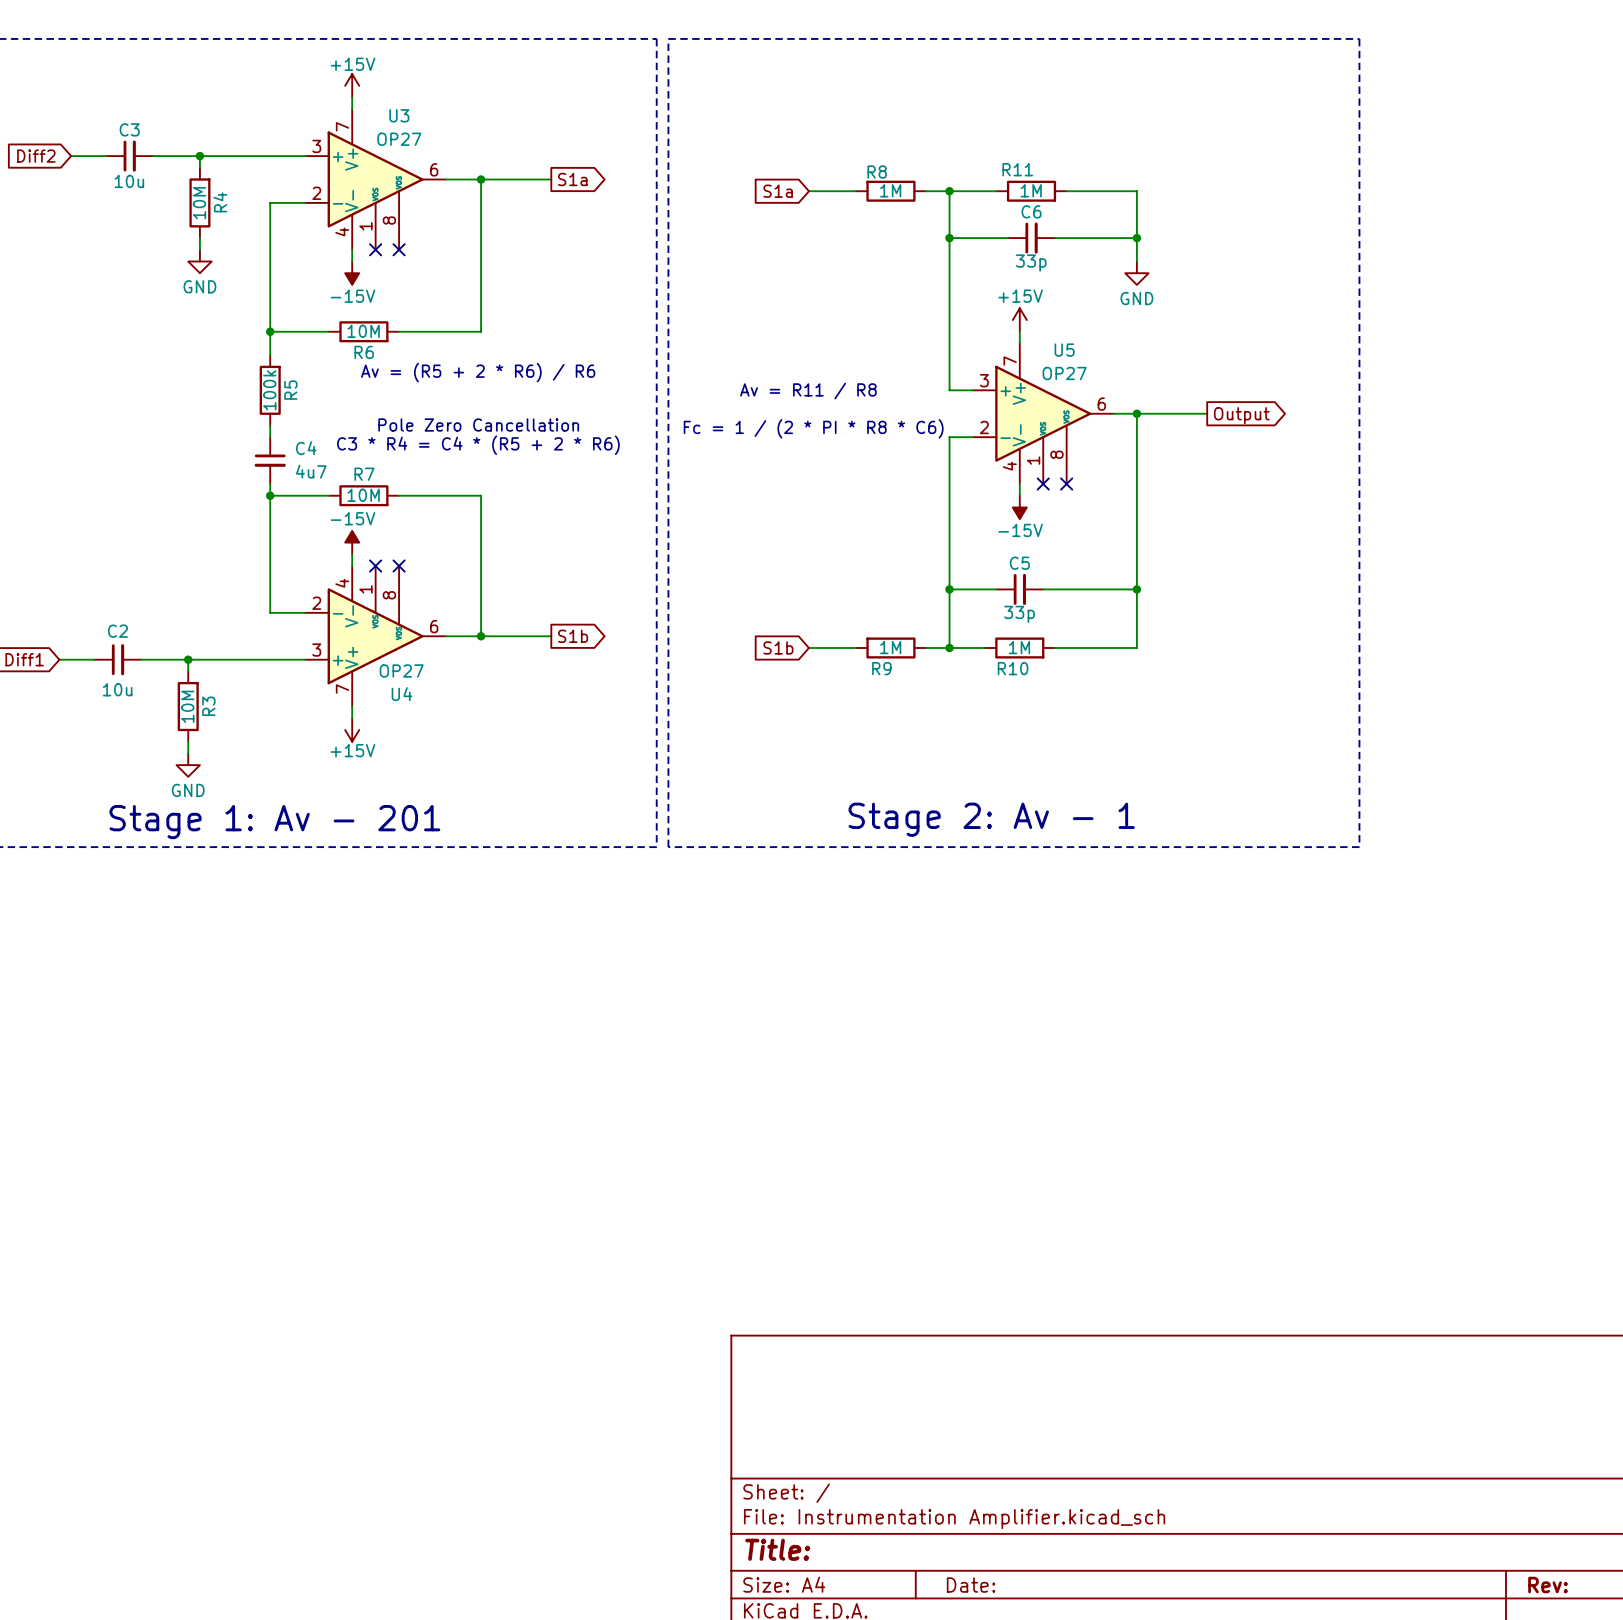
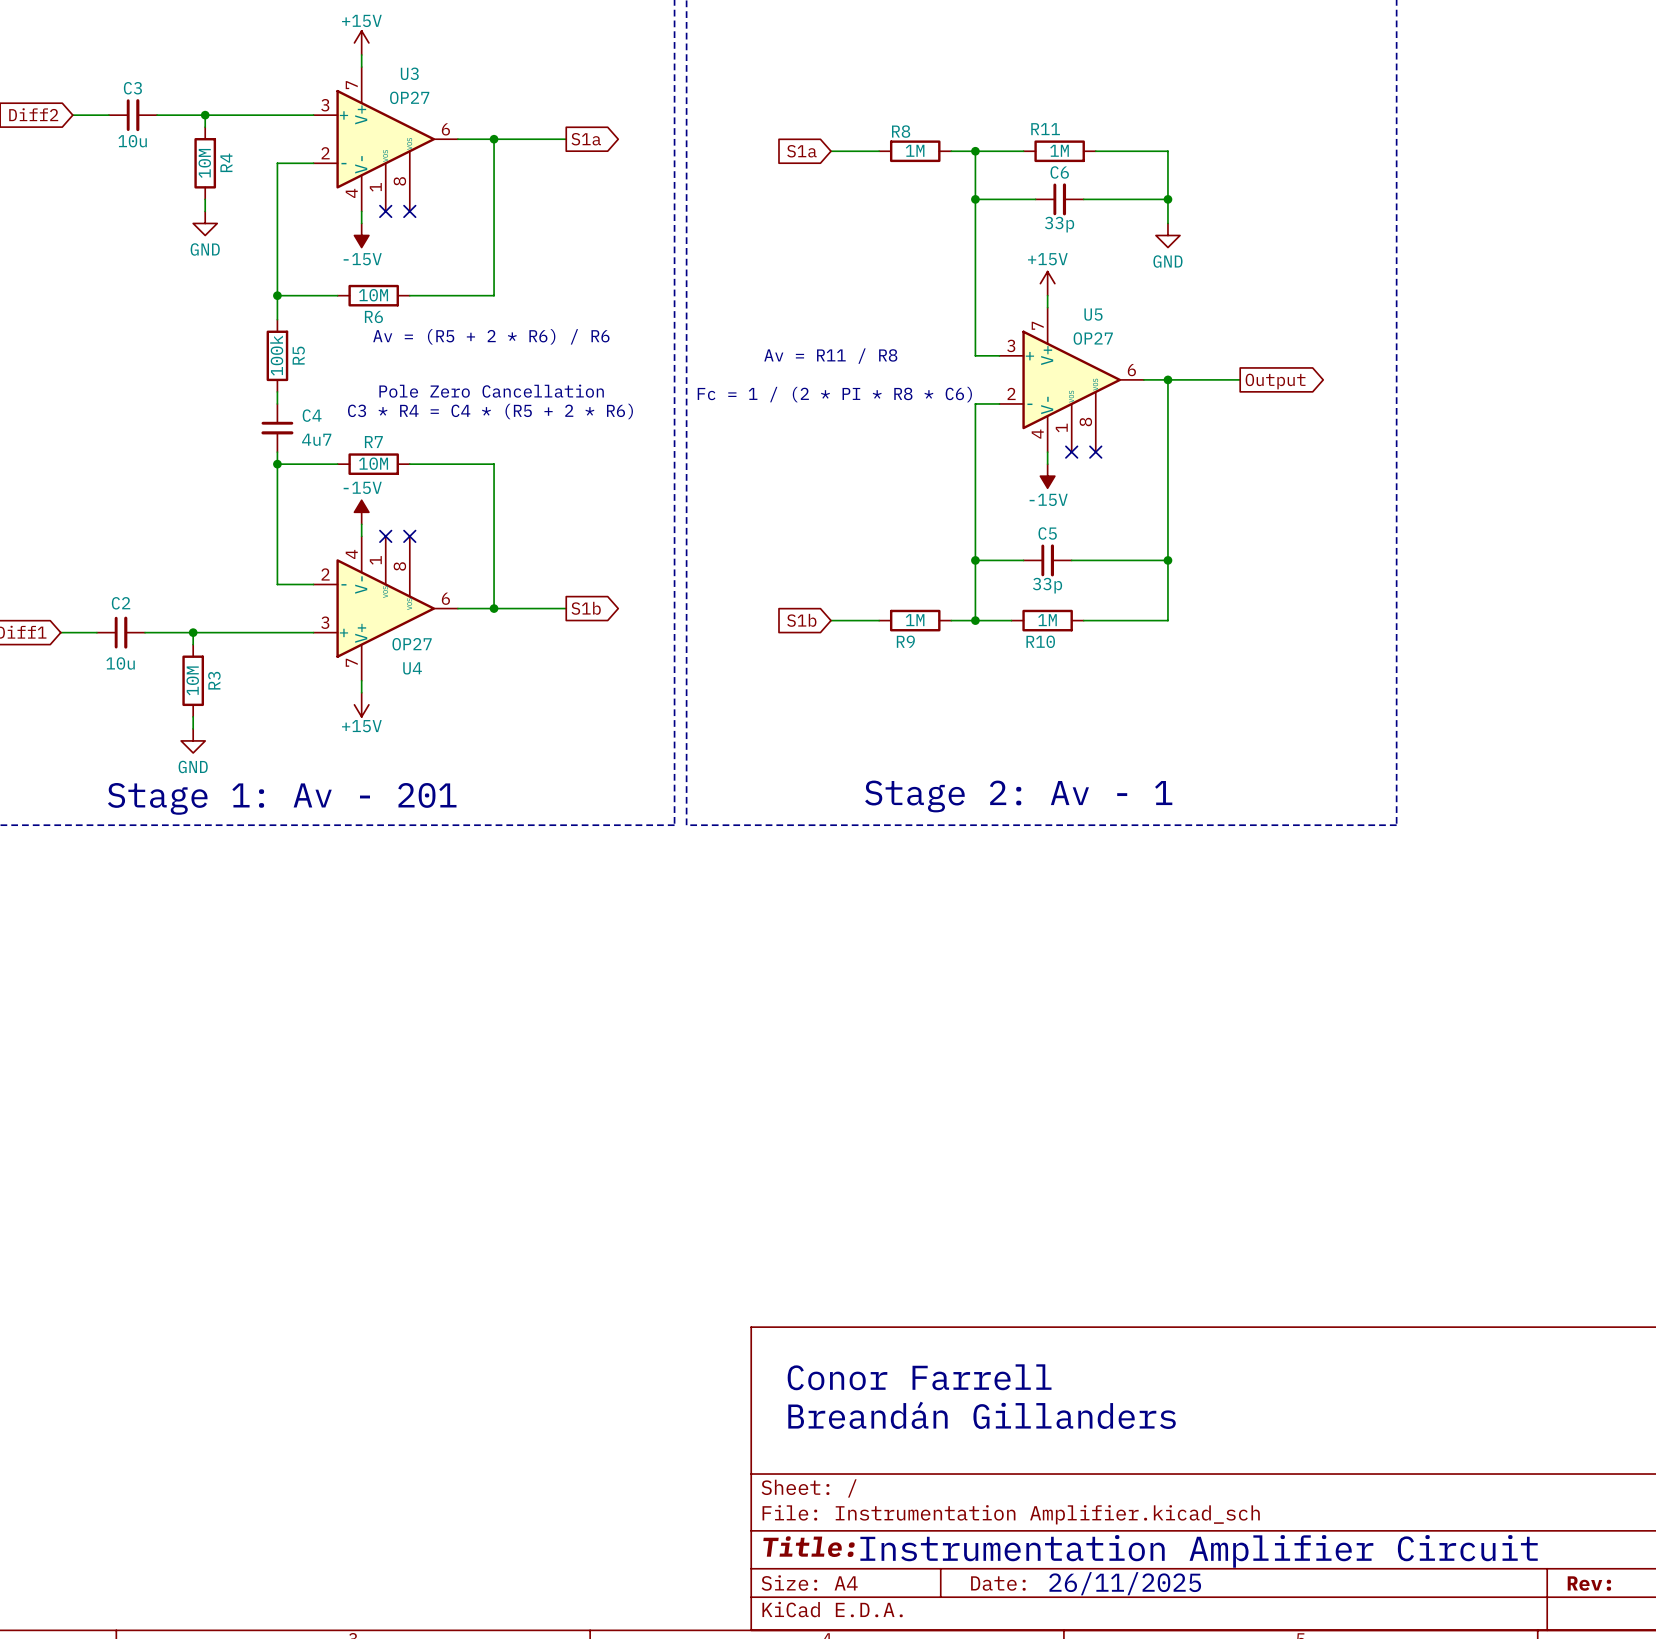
text: none -> Conor Farrell (919, 1377)
text: none -> Breandán Gillanders (982, 1415)
text: none -> Instrumentation Amplifier Circuit (1199, 1551)
text: none -> 26/11/2025 (1125, 1583)

